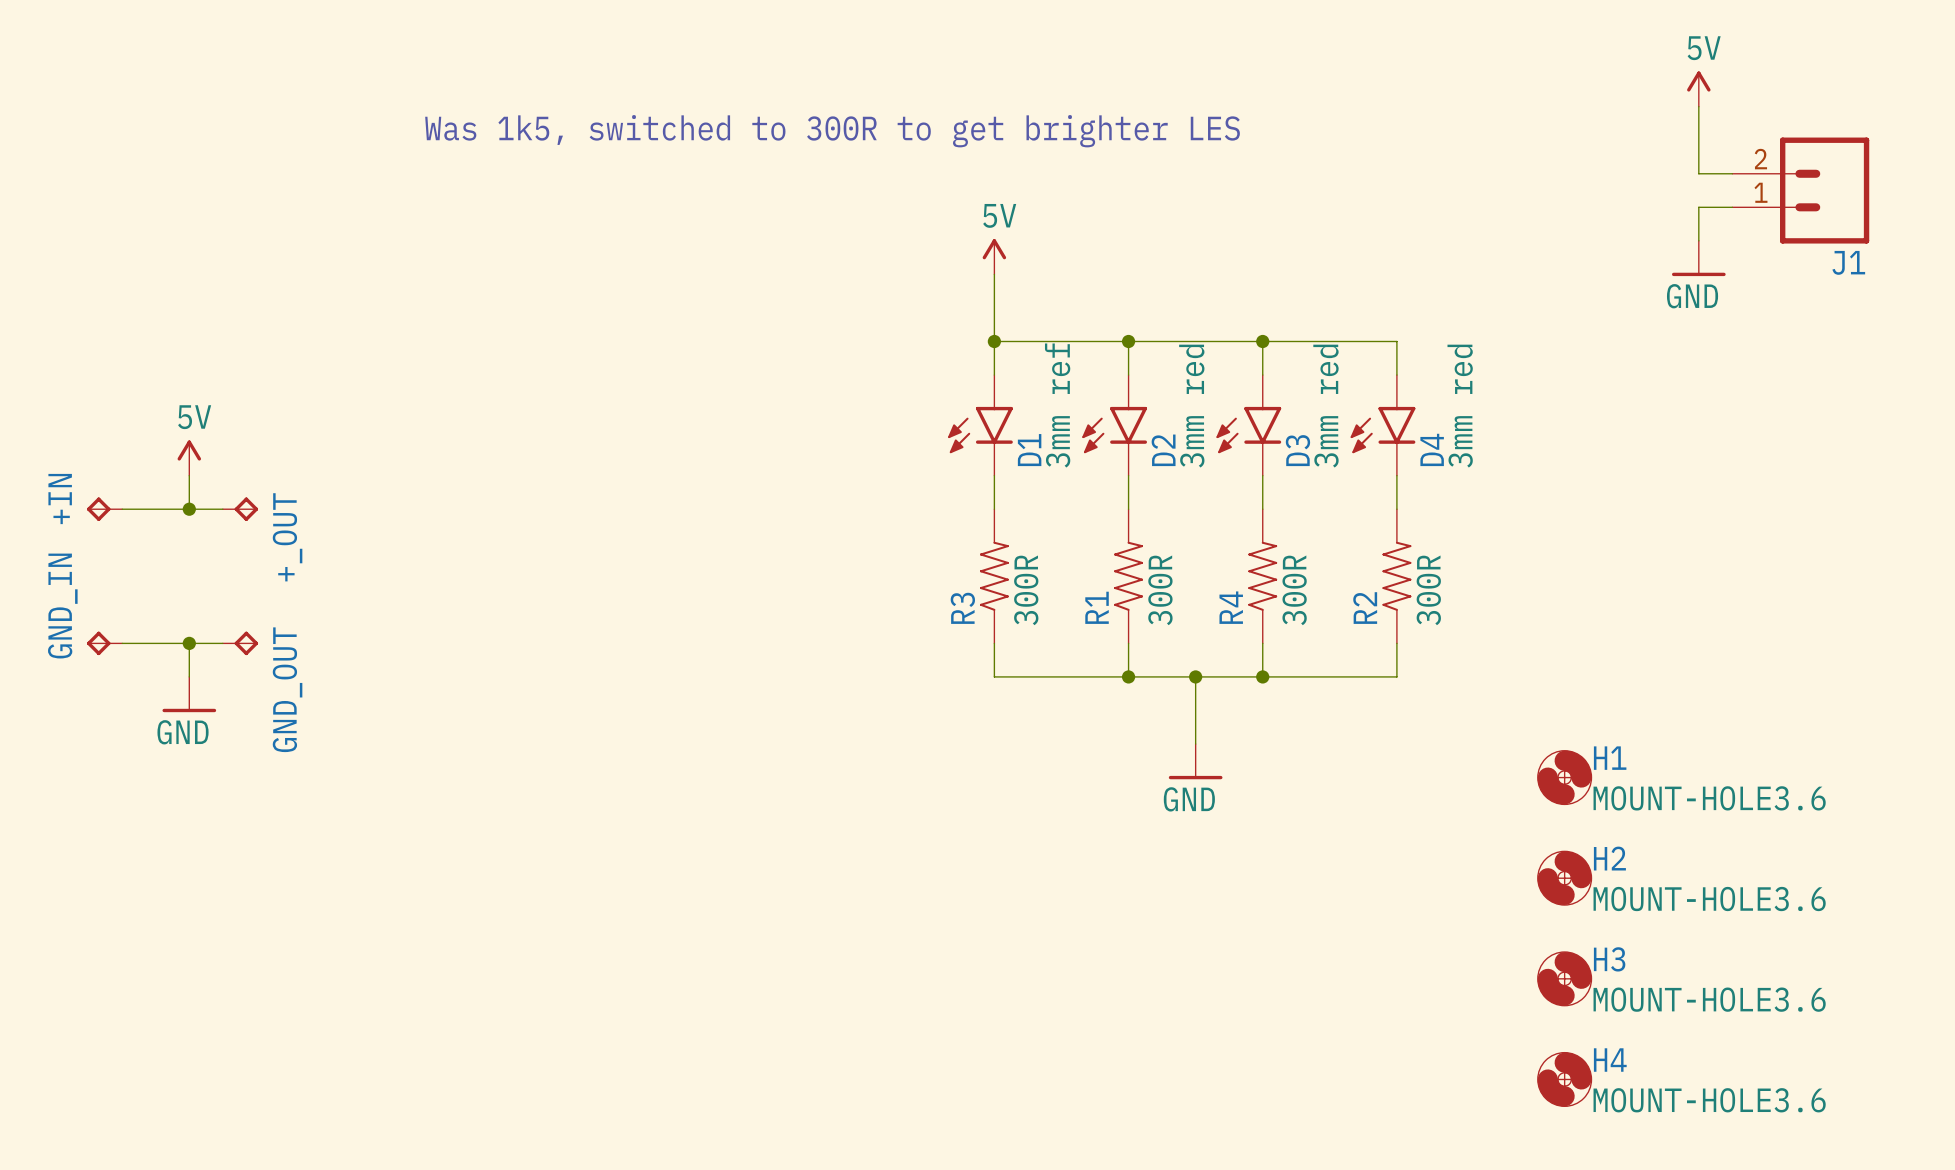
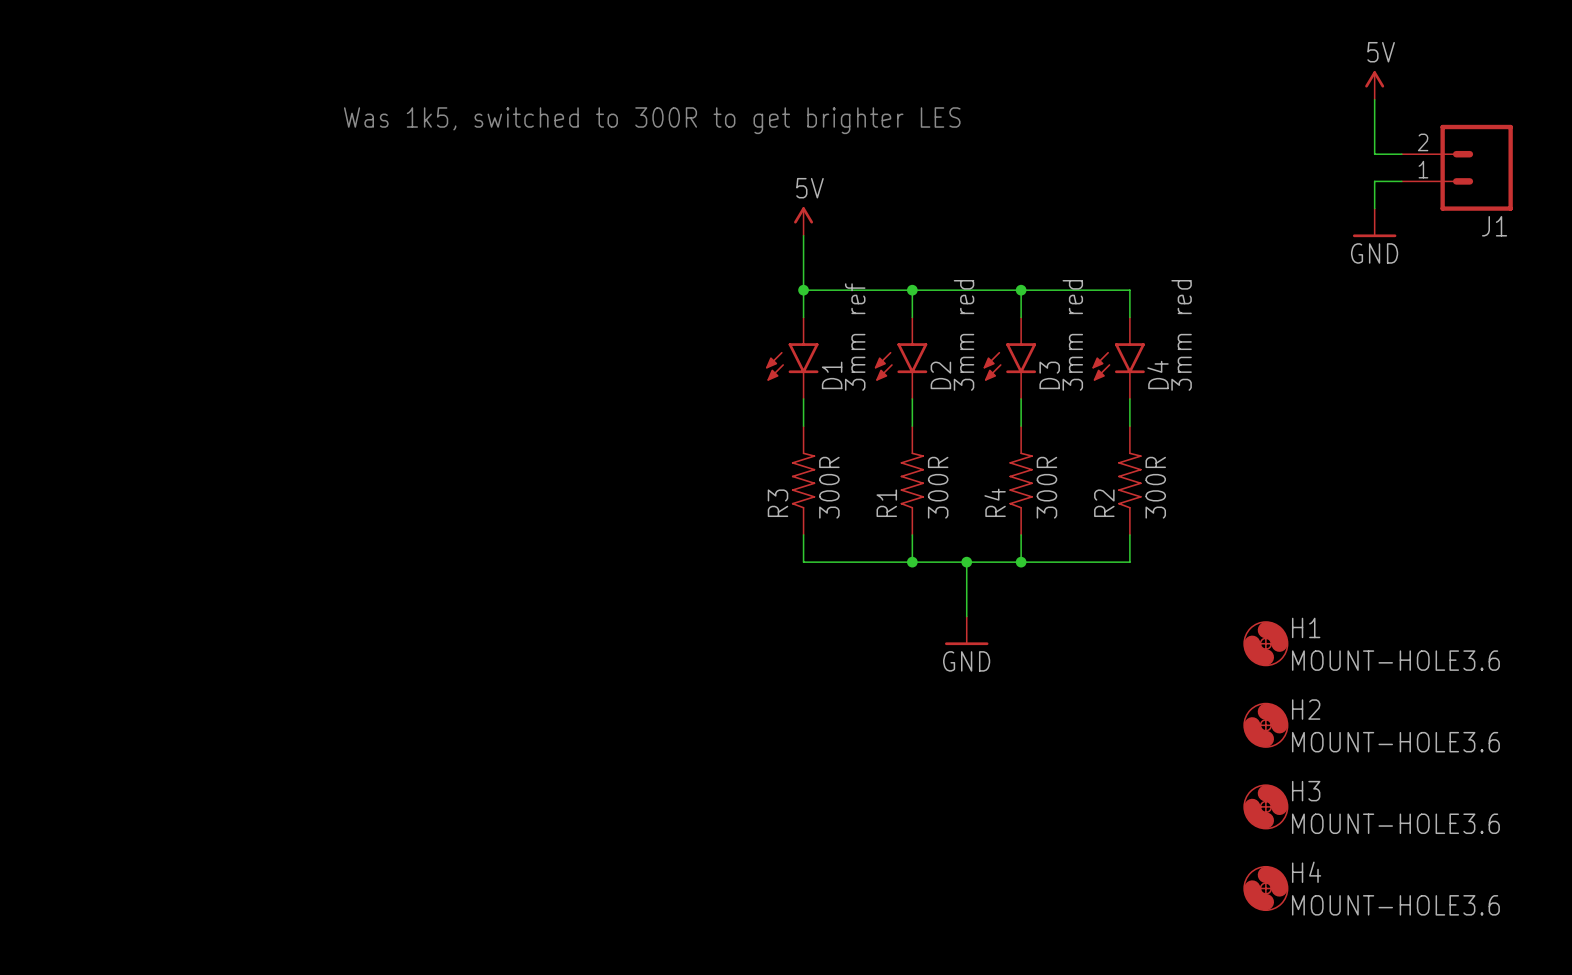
power symbol: 5V (189, 458) -> none
wire: (189, 475) (189, 509) -> none
+IN: (104, 509) -> none
wire: (122, 509) (222, 509) -> none
junction: (189, 509) -> none
+_OUT: (240, 509) -> none
GND_IN: (104, 643) -> none
wire: (122, 643) (222, 643) -> none
wire: (189, 643) (189, 676) -> none
junction: (189, 643) -> none
GND_OUT: (240, 643) -> none
power symbol: GND (189, 694) -> none

